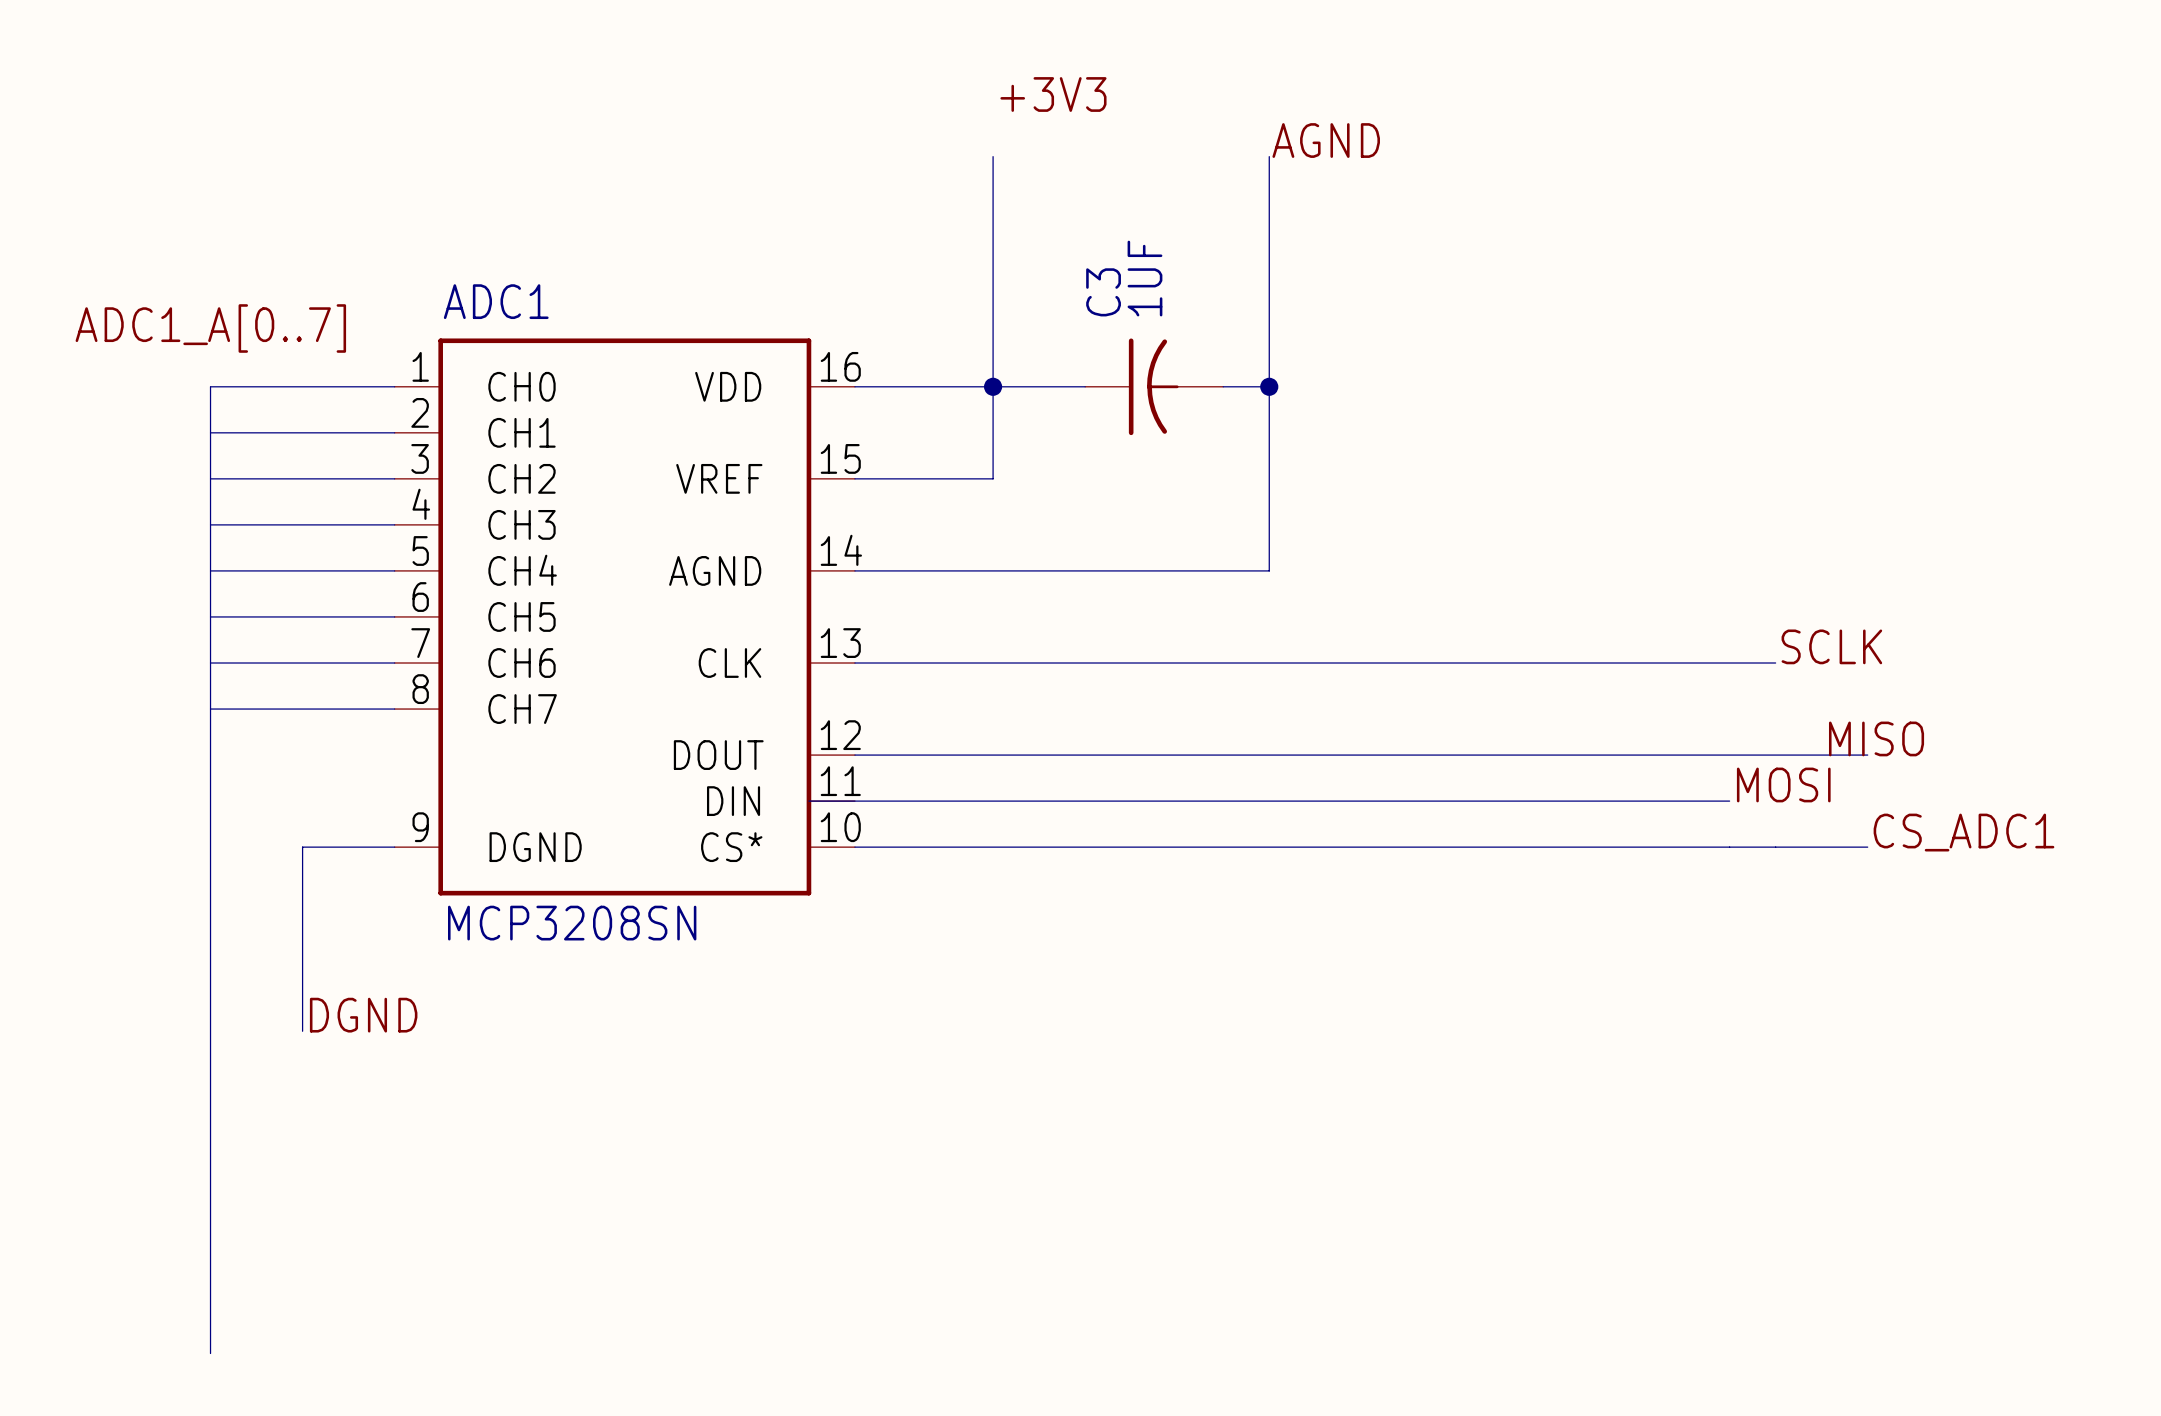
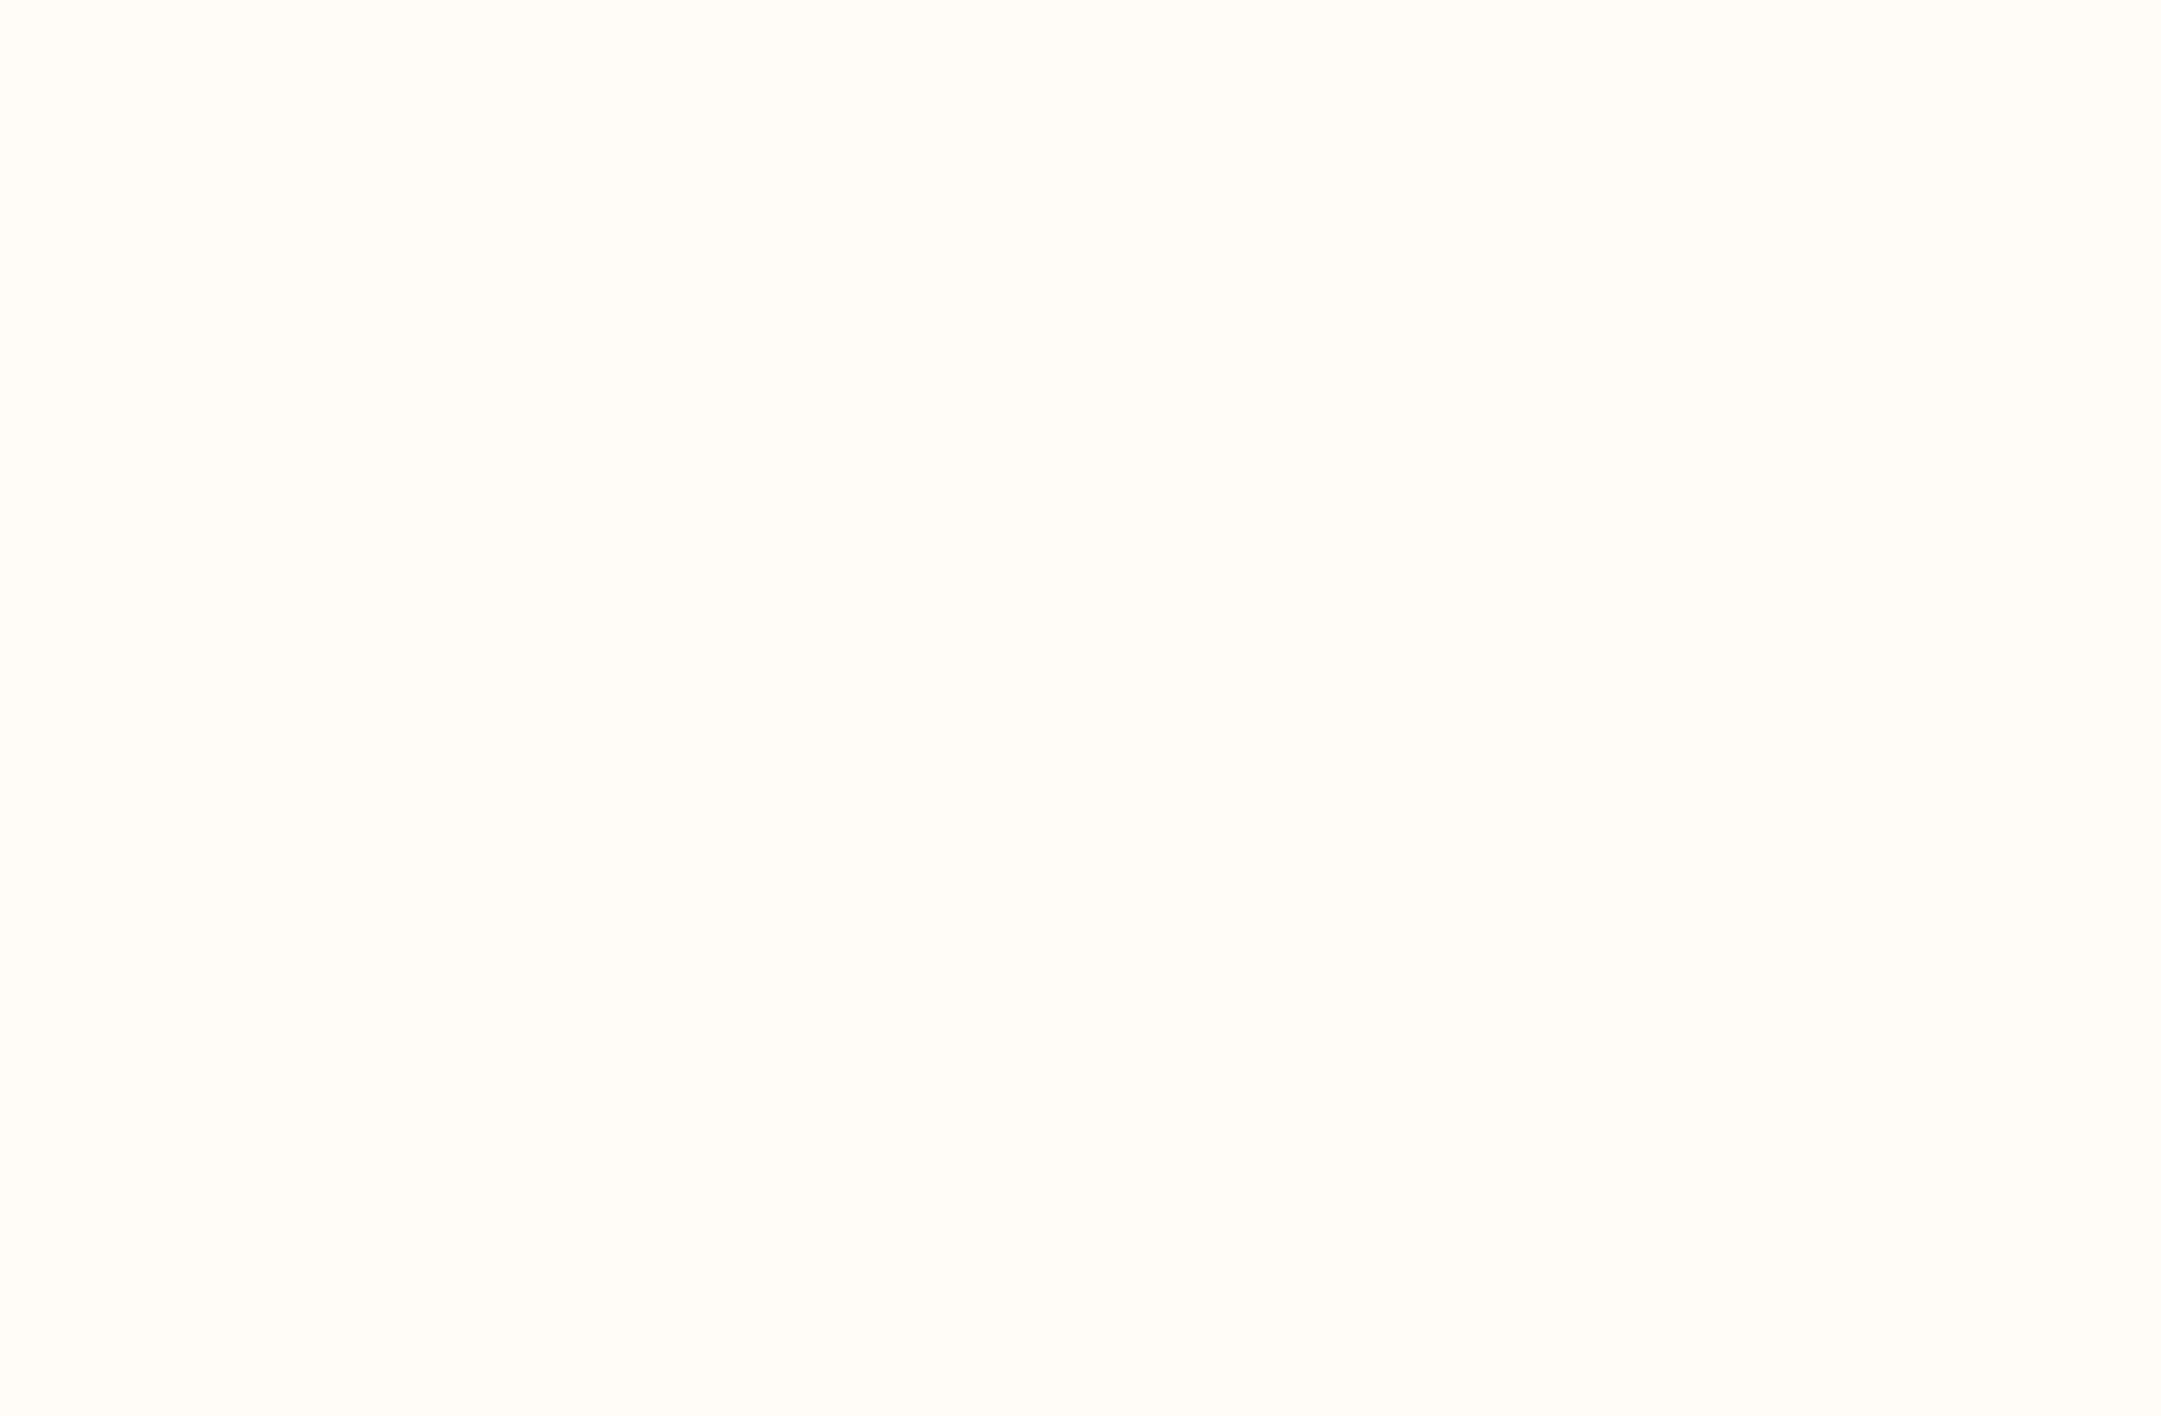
label: +3V3 (1053, 94) -> none
label: AGND (1326, 140) -> none
wire: (993, 156) (993, 478) (854, 478) -> none
wire: (1269, 156) (1269, 570) (854, 570) -> none
label: ADC1_A[0..7] (210, 328) -> none
bus: (210, 386) (210, 1353) -> none
wire: (210, 386) (394, 386) -> none
wire: (854, 386) (1085, 386) -> none
junction: (993, 386) -> none
C3: 1UF (1154, 386) -> none
wire: (1223, 386) (1269, 386) -> none
junction: (1269, 386) -> none
wire: (210, 432) (394, 432) -> none
wire: (210, 478) (394, 478) -> none
wire: (210, 524) (394, 524) -> none
wire: (210, 570) (394, 570) -> none
wire: (210, 616) (394, 616) -> none
ADC1: MCP3208SN (624, 616) -> none
label: SCLK (1831, 646) -> none
wire: (210, 663) (394, 663) -> none
wire: (854, 663) (1775, 663) -> none
wire: (210, 709) (394, 709) -> none
label: MISO (1876, 738) -> none
wire: (854, 755) (1867, 755) -> none
label: MOSI (1783, 784) -> none
wire: (808, 801) (1729, 801) -> none
label: CS_ADC1 (1963, 832) -> none
wire: (394, 847) (302, 847) (302, 1031) -> none
wire: (854, 847) (1867, 847) -> none
label: DGND (363, 1015) -> none

